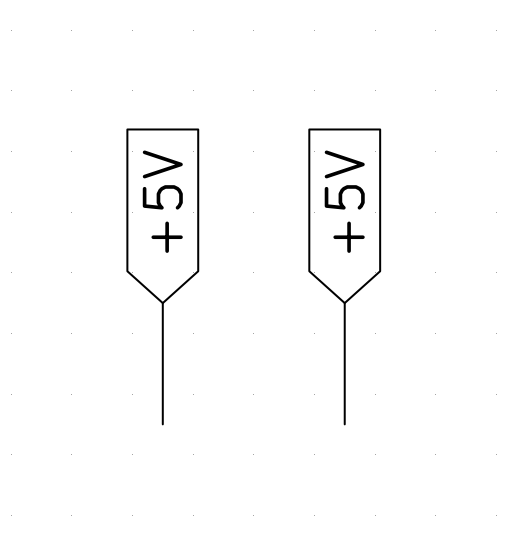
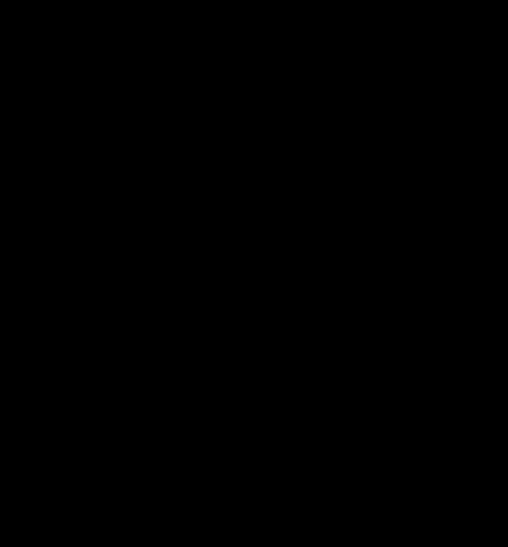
global label: +5V (162, 201) -> none
global label: +5V (344, 201) -> none
wire: (162, 303) (162, 424) -> none
wire: (344, 303) (344, 424) -> none

